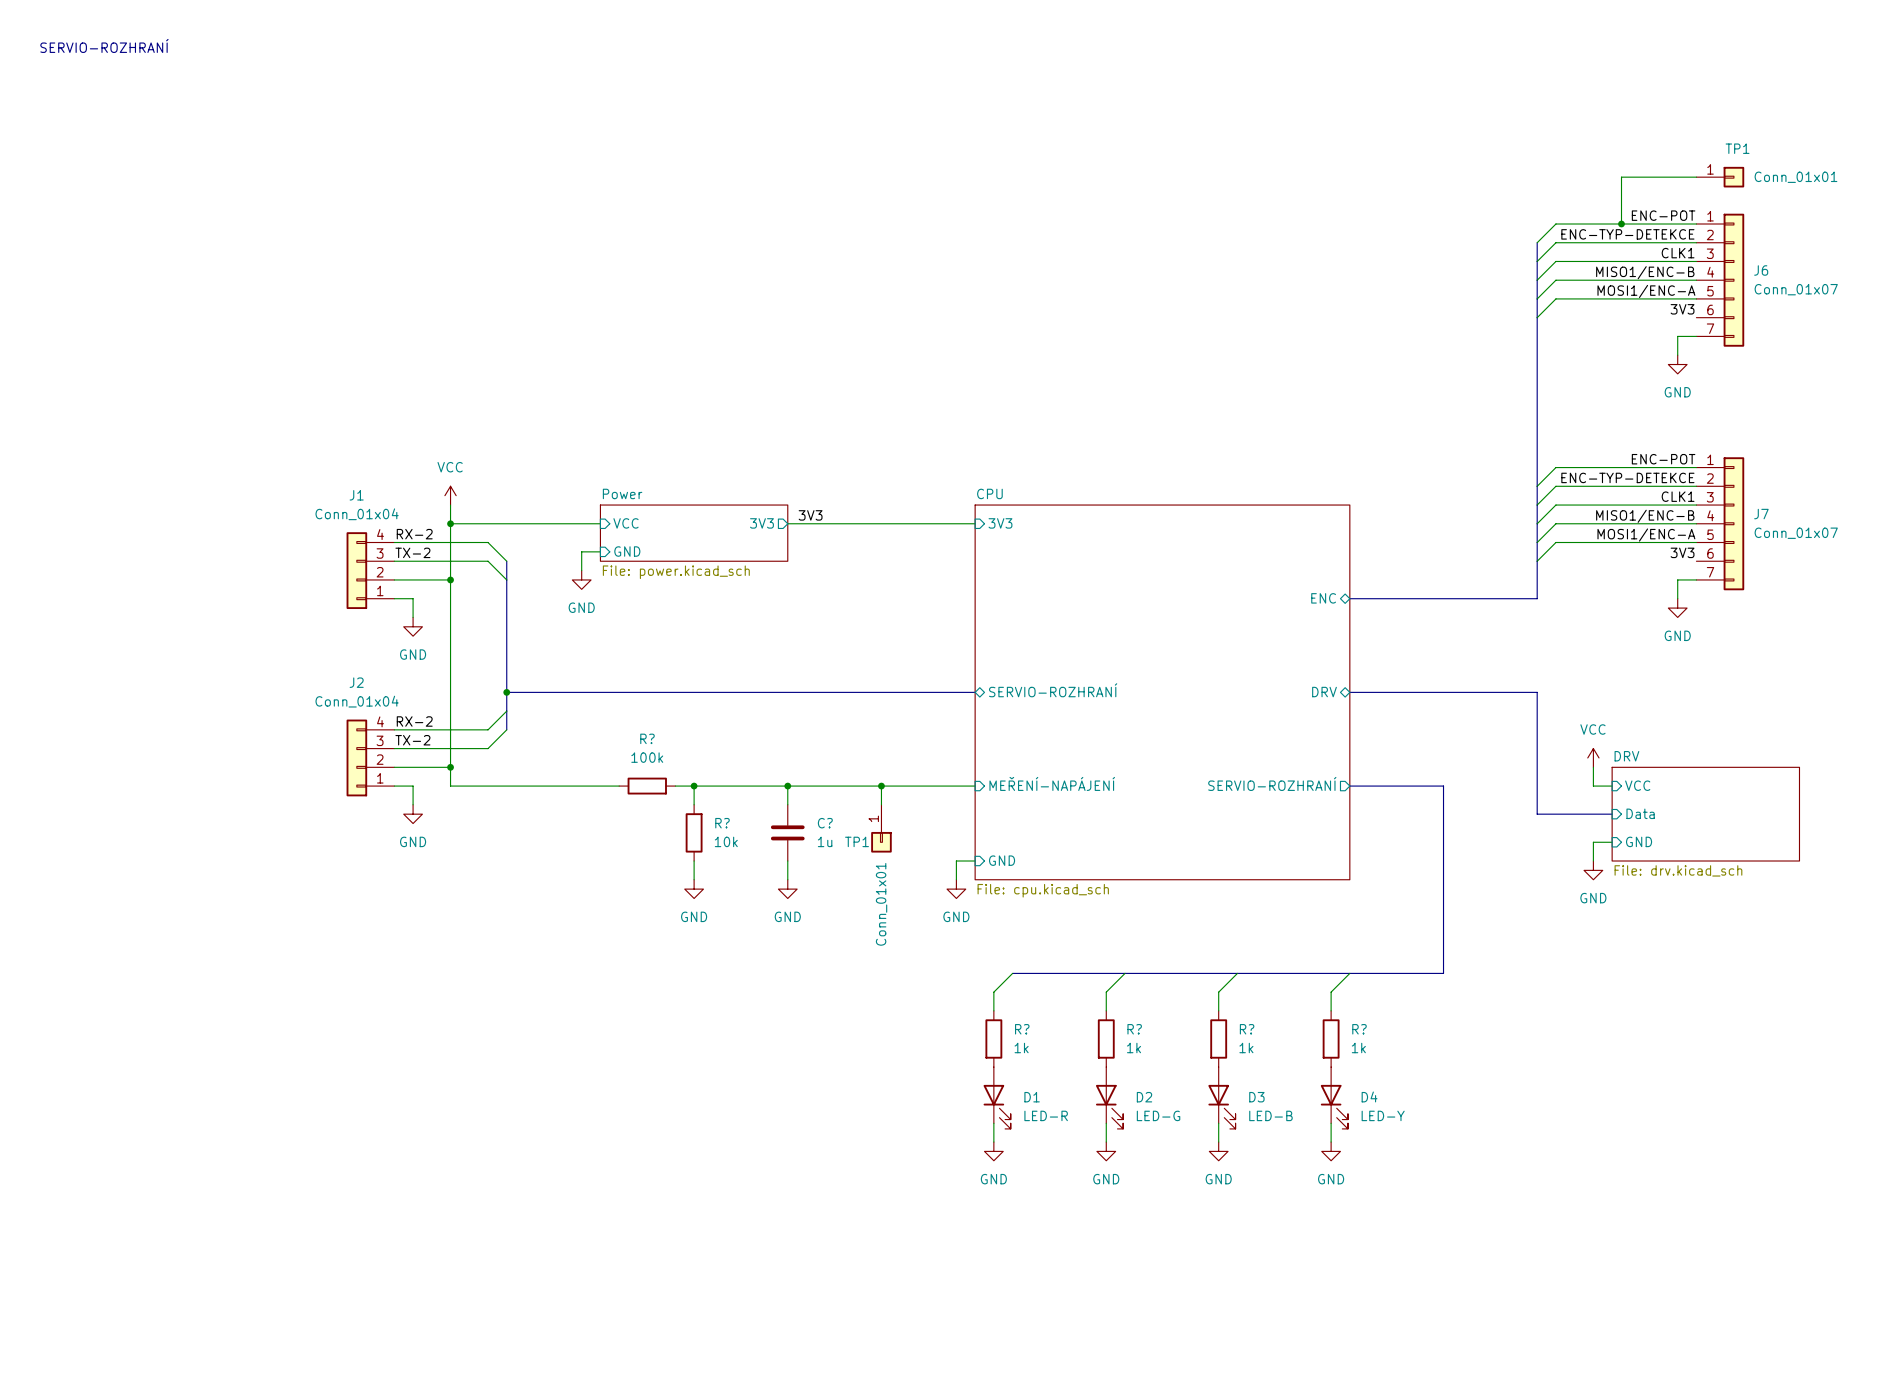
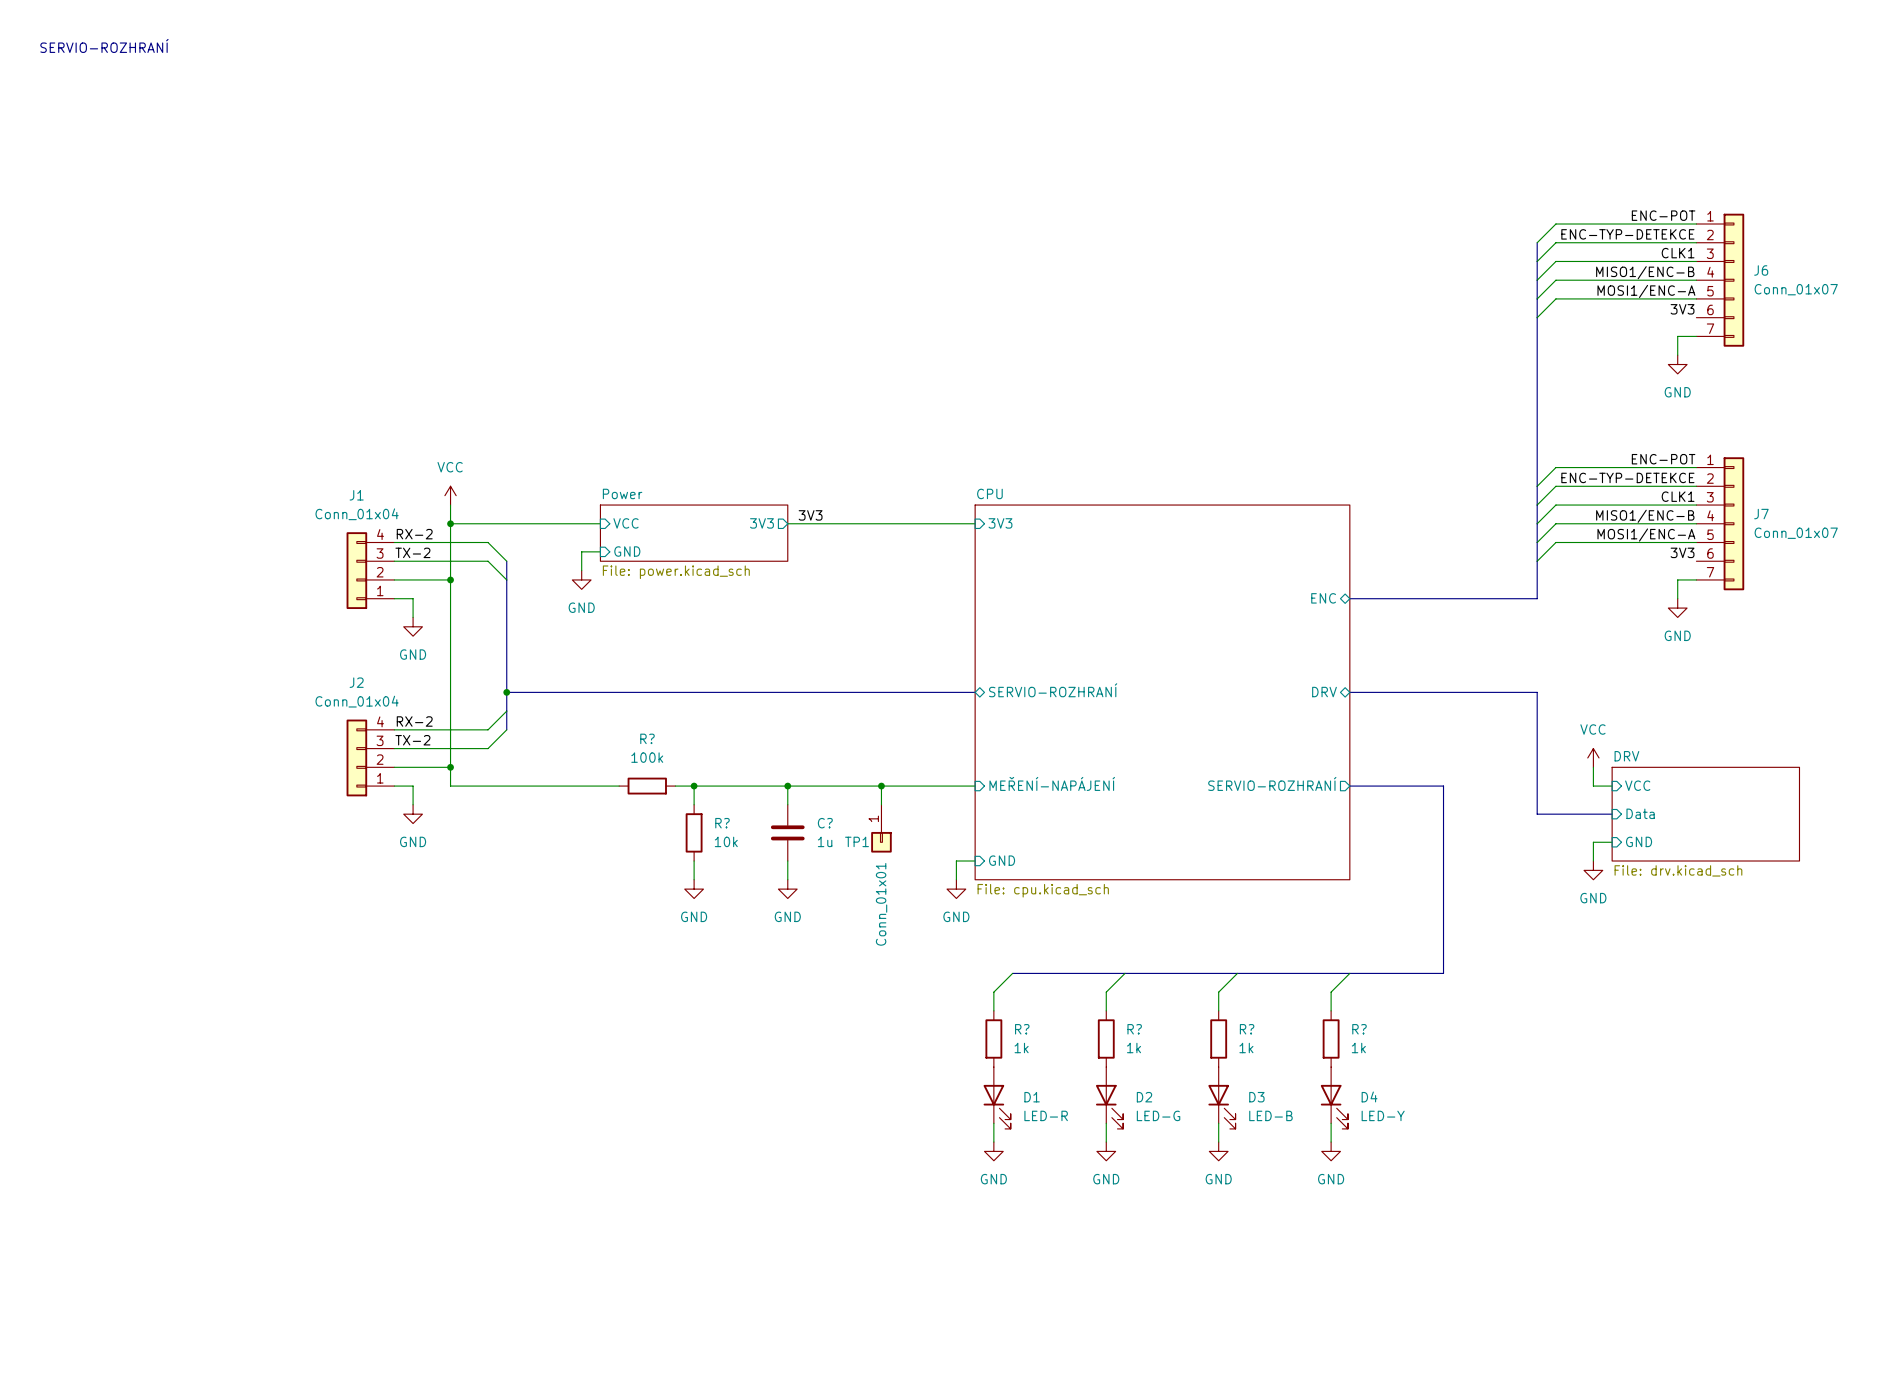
wire: (1696, 177) (1621, 177) (1621, 224) -> none
TP1: Conn_01x01 (1720, 177) -> none
junction: (1621, 224) -> none

